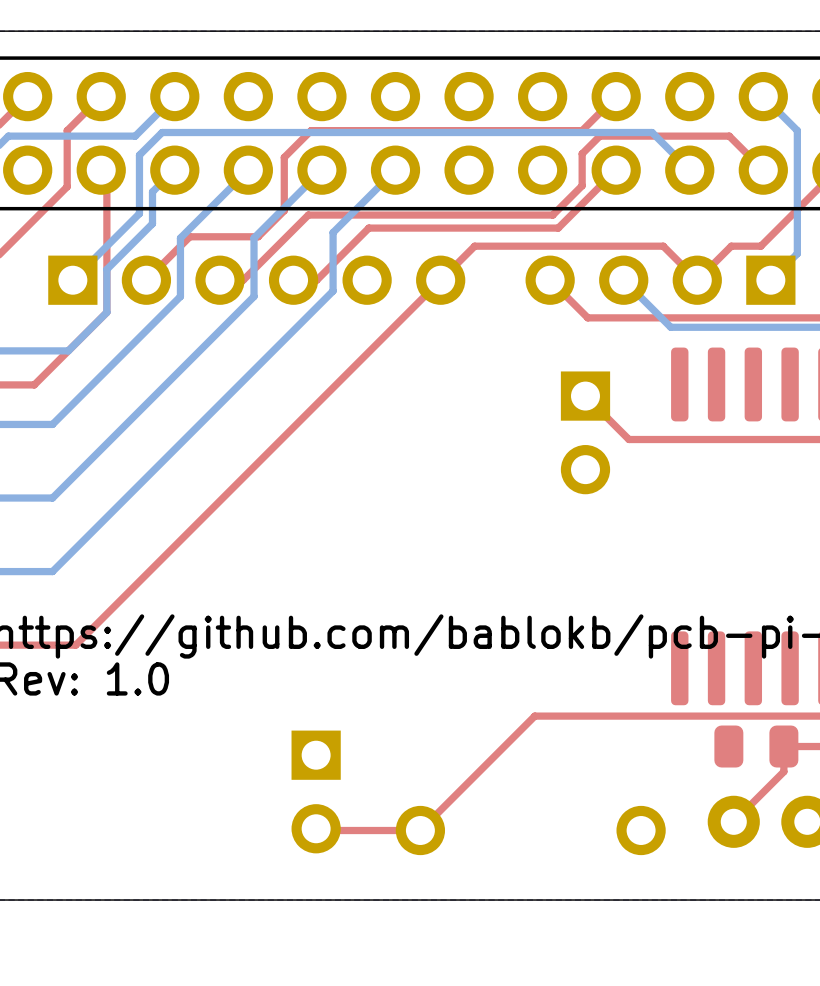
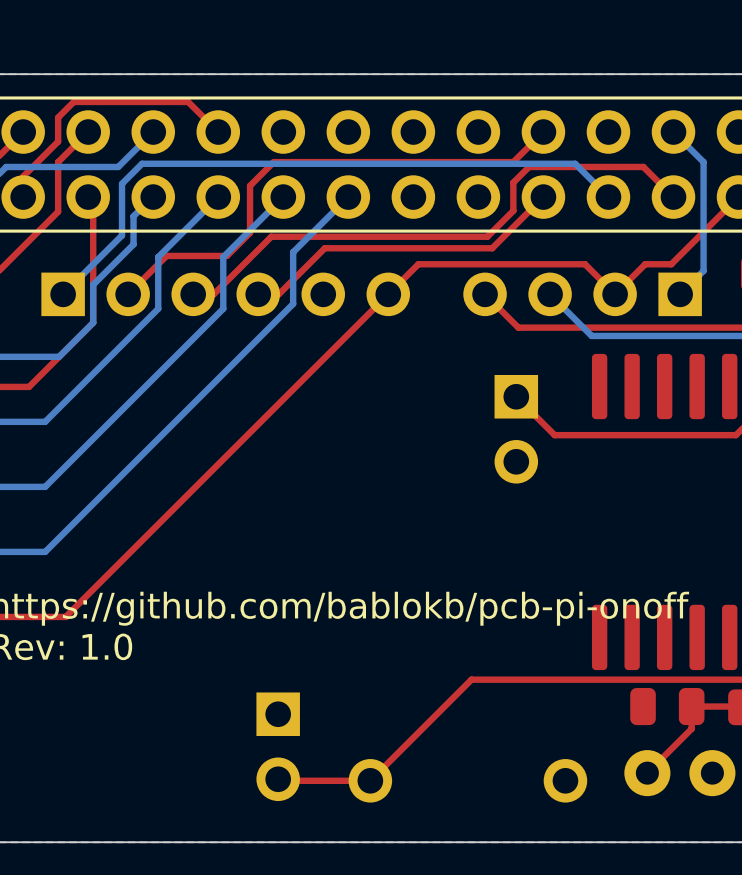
top track: none -> (218, 132) (188, 101) (73, 101) (58, 117) (58, 141) (23, 176) (23, 197)

